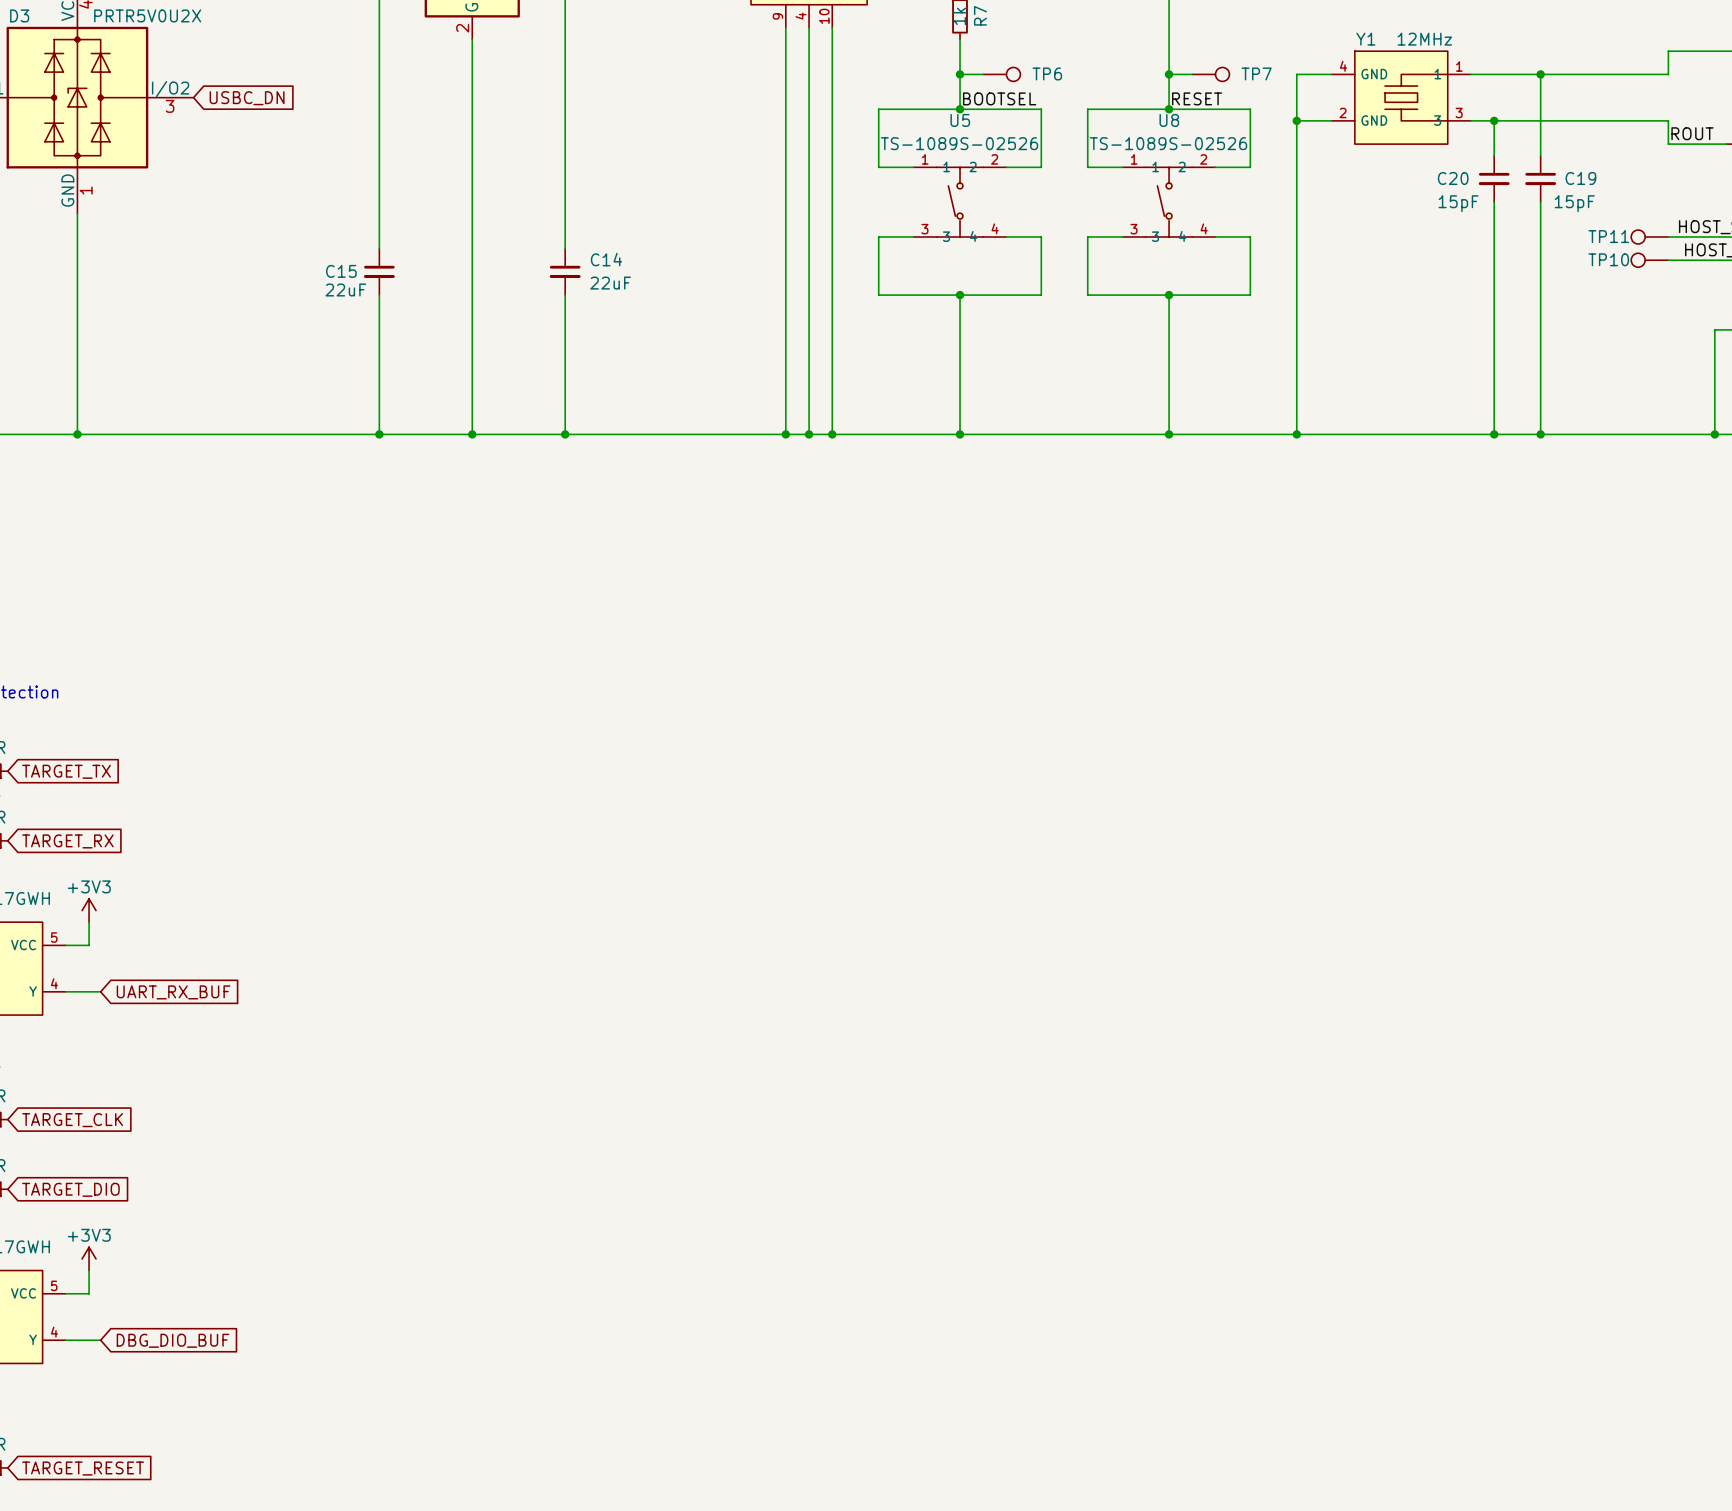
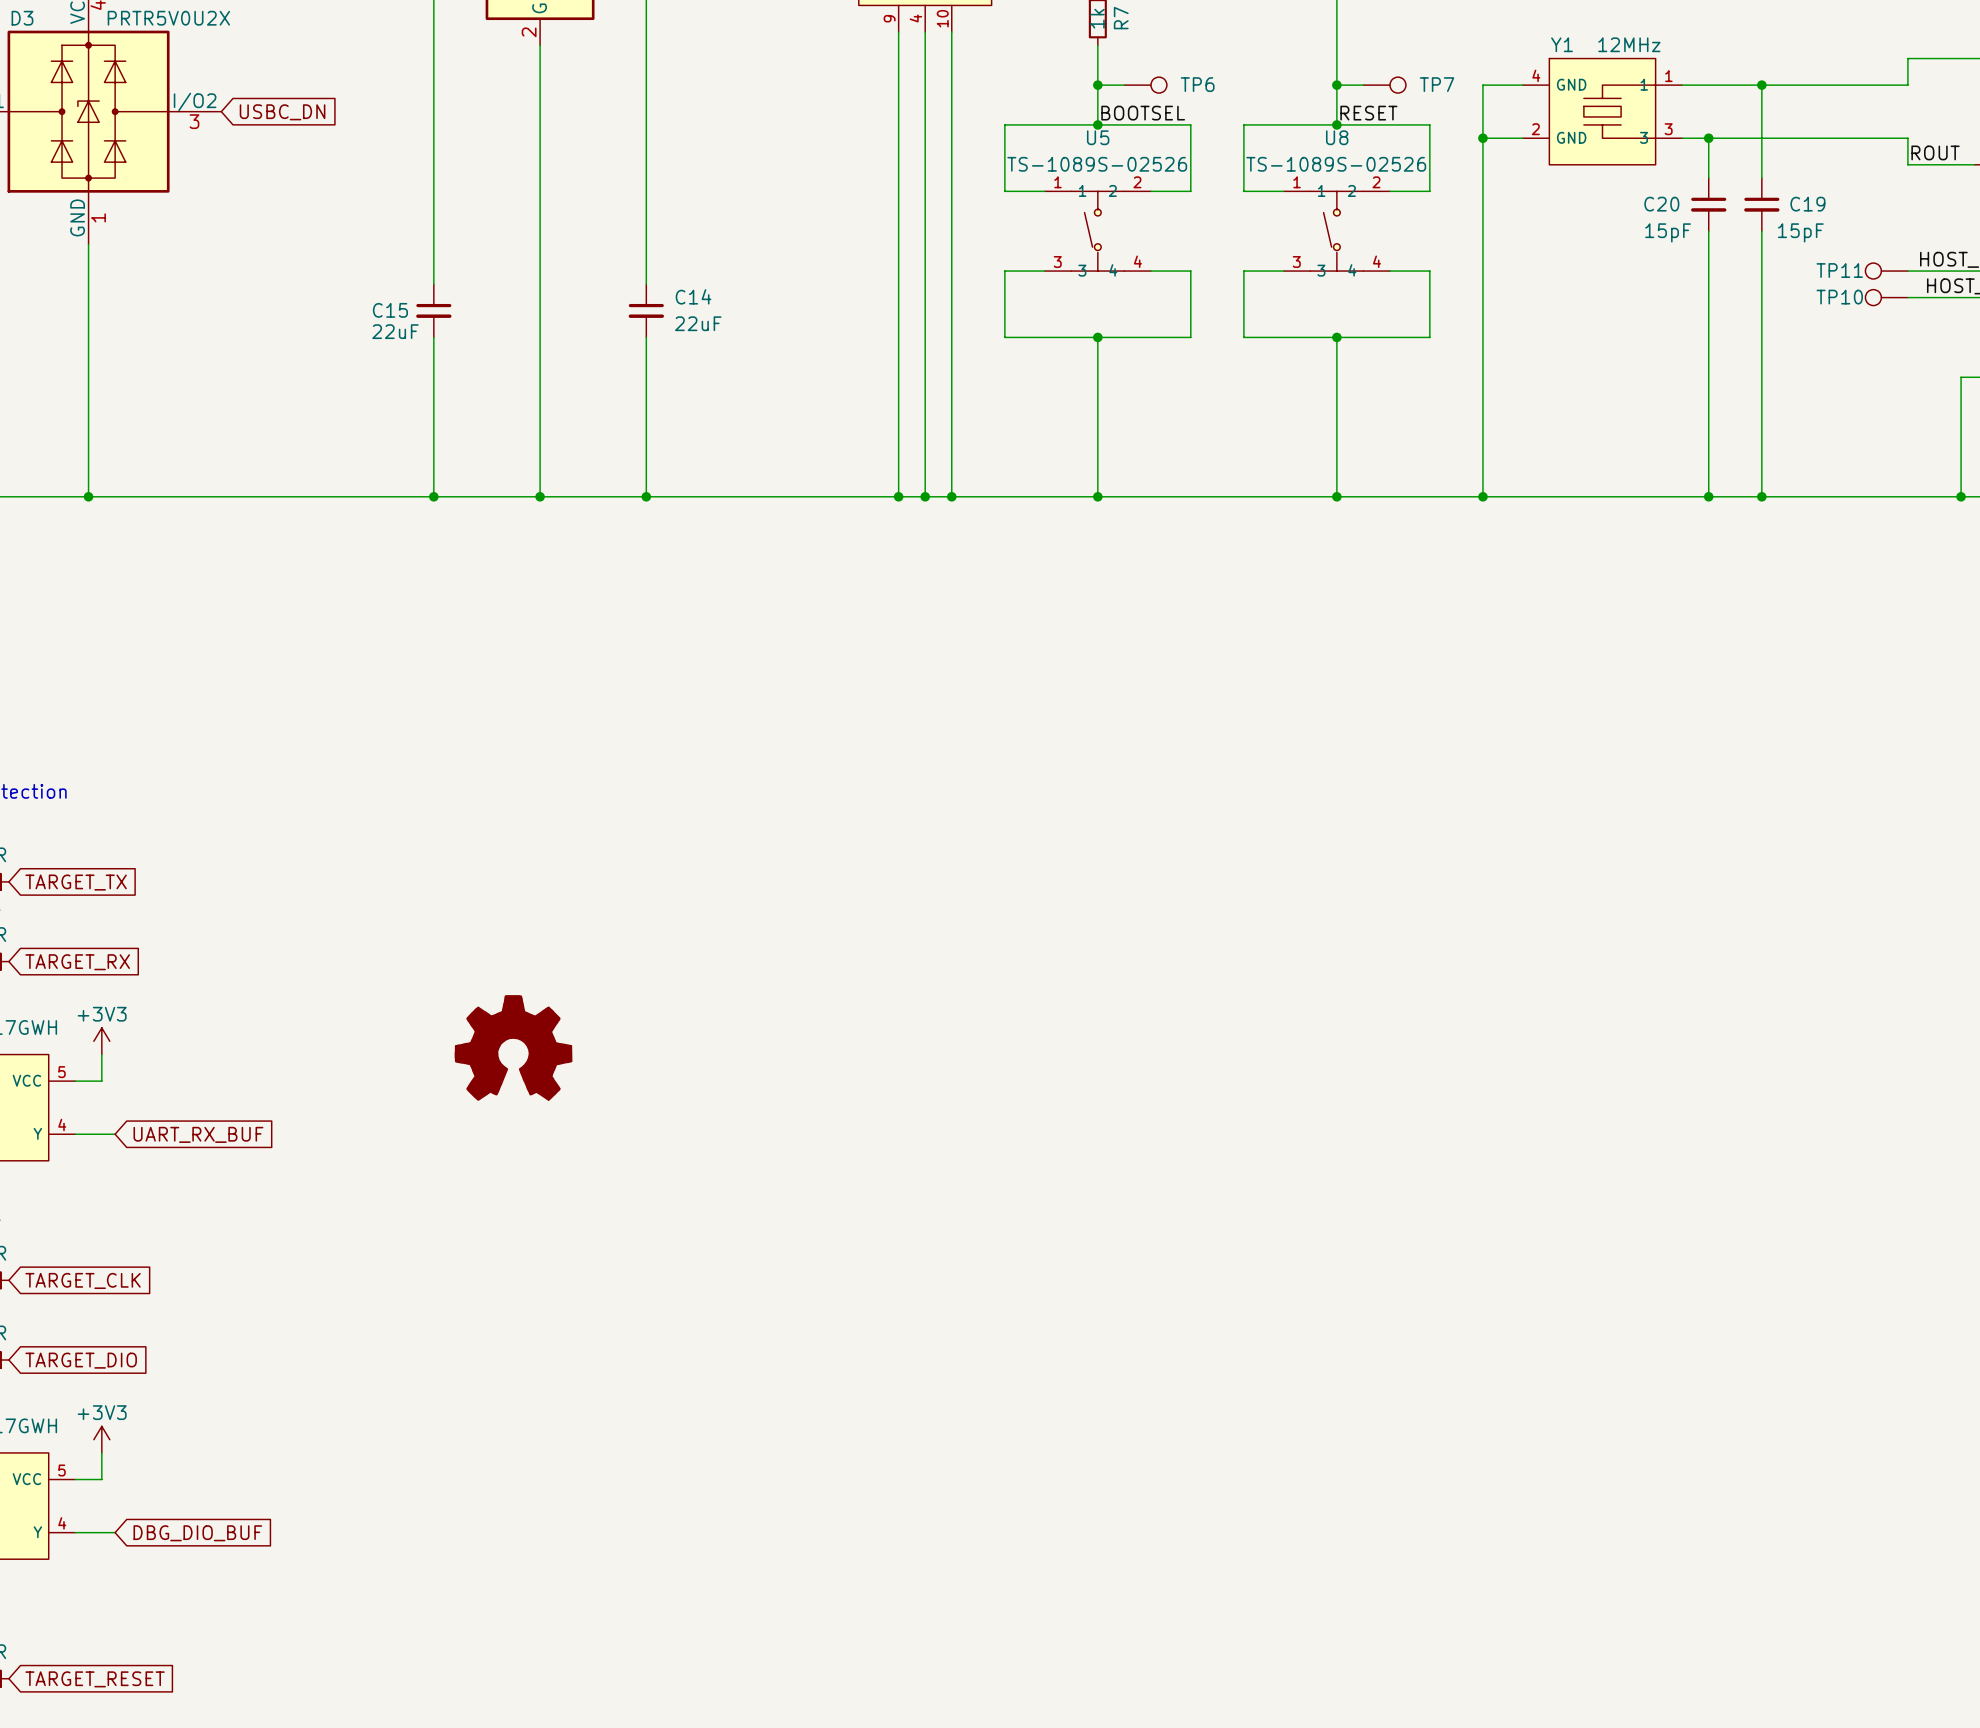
power symbol: none -> (513, 1047)

